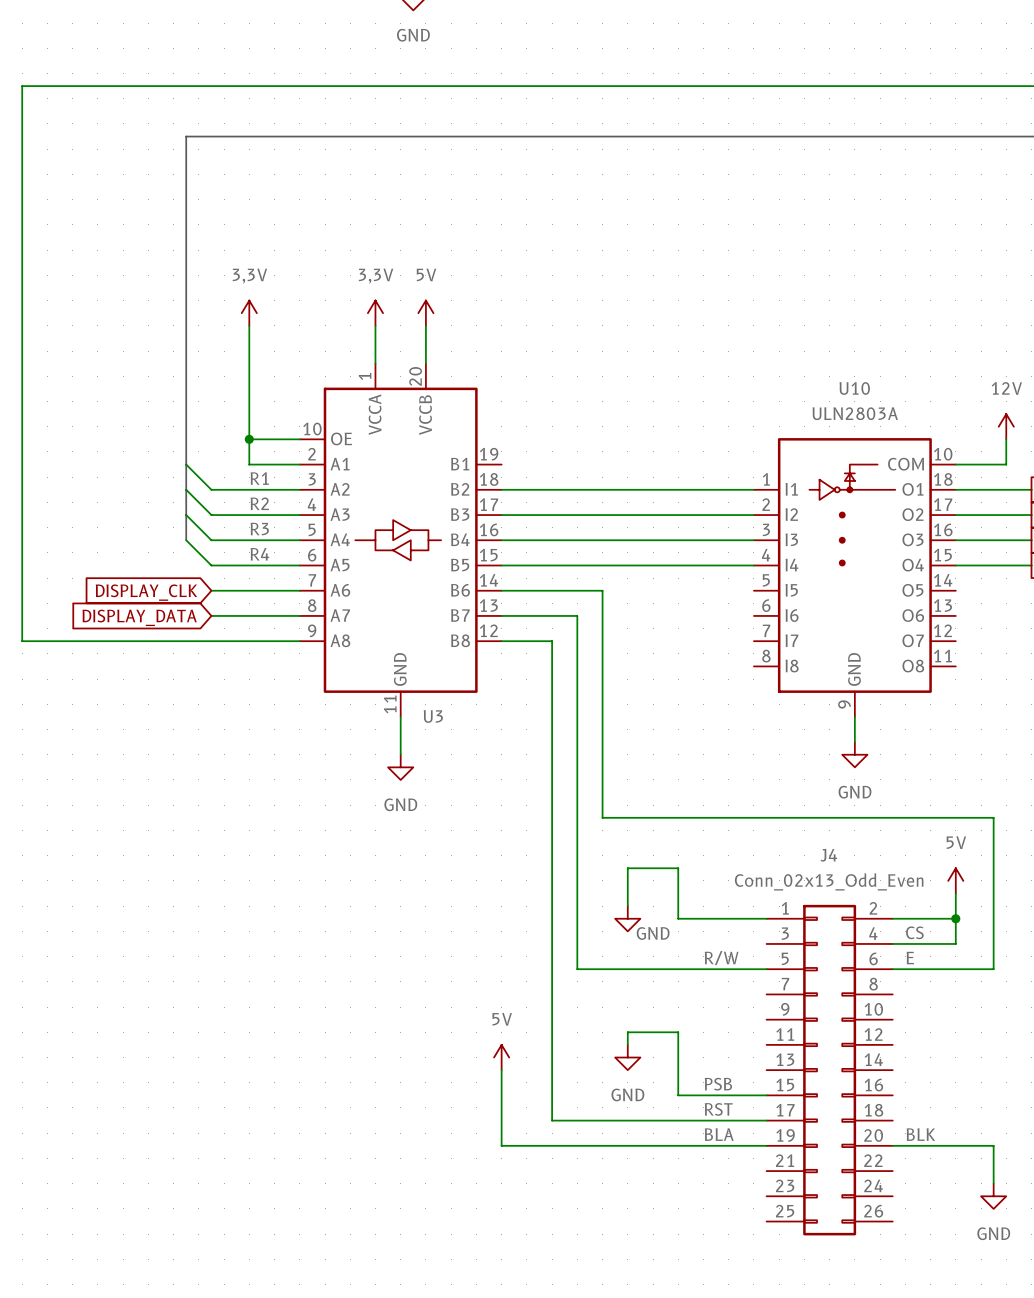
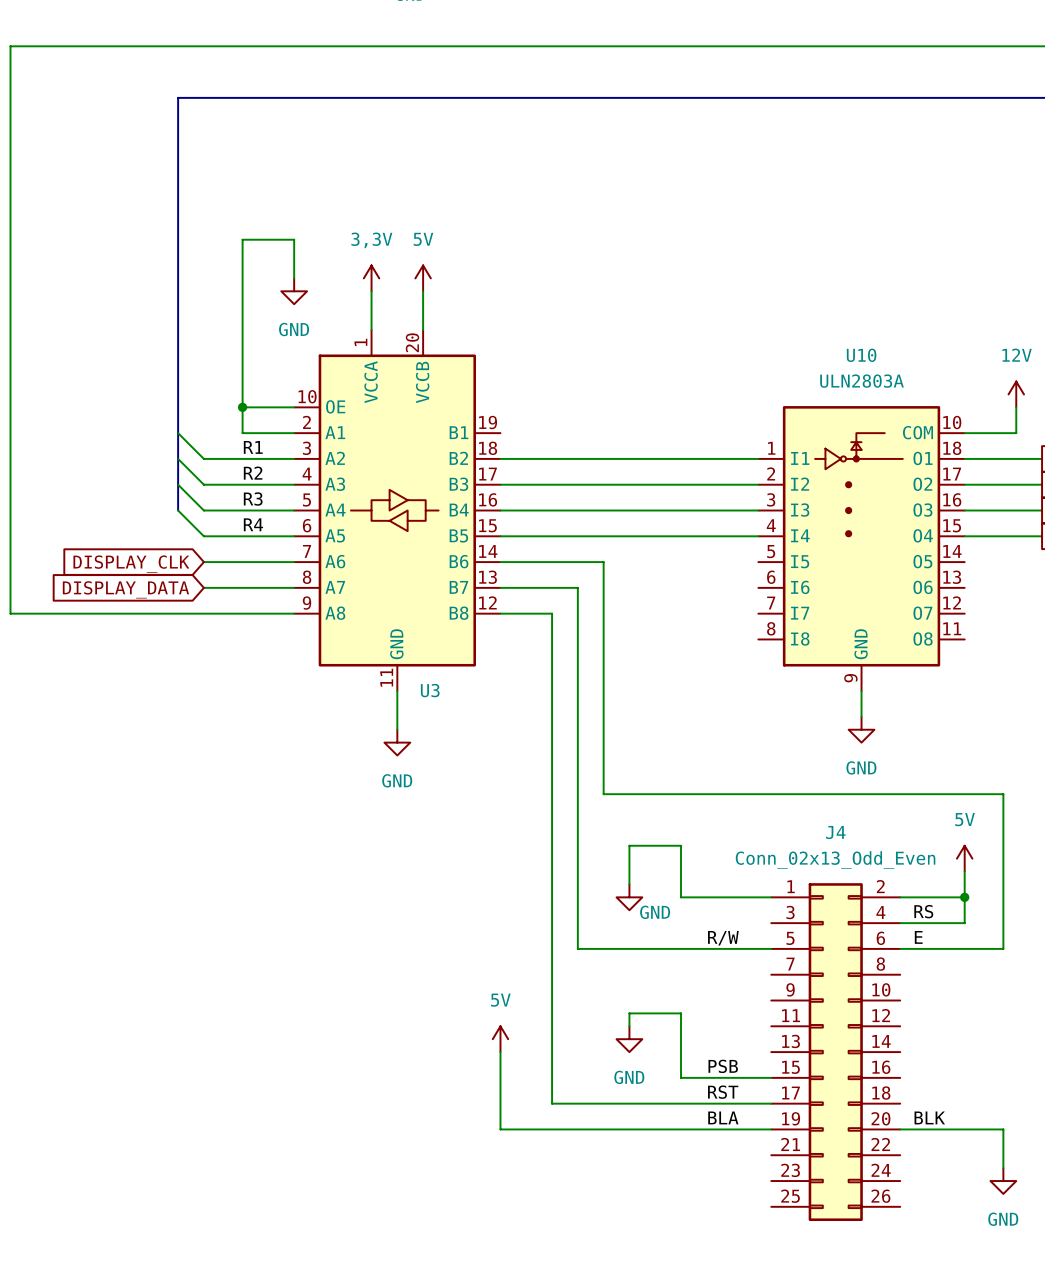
power symbol: 3,3V (249, 313) -> none
wire: none -> (294, 278) (294, 239) (242, 239) (242, 291)
power symbol: none -> GND (294, 291)
label: CS (914, 932) -> RS (923, 911)

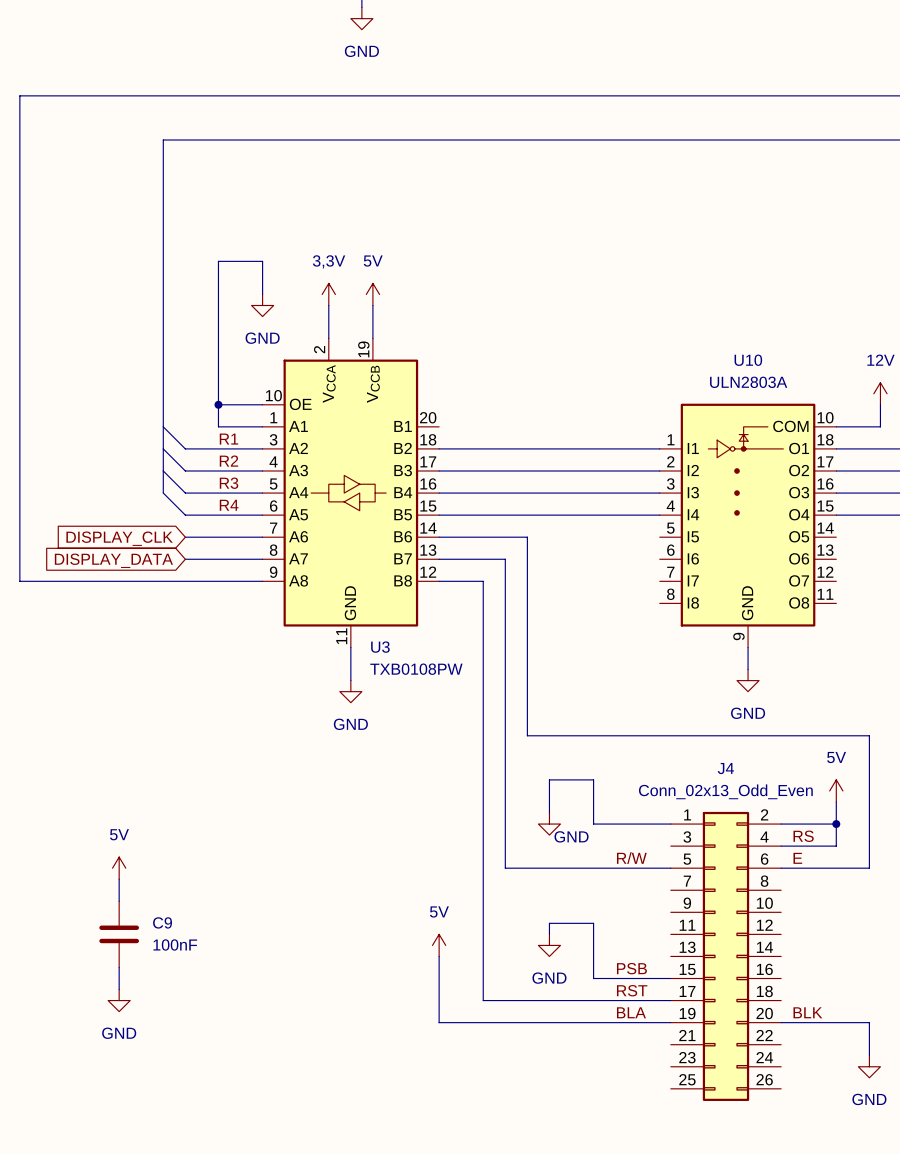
U3 symbol: [294, 329, 501, 692] -> [262, 338, 440, 648]
U3 value: none -> TXB0108PW (416, 669)
power symbol: none -> 5V (119, 868)
wire: none -> (119, 879) (119, 901)
C9: none -> 100nF (119, 934)
wire: none -> (119, 967) (119, 989)
power symbol: none -> GND (119, 1000)

